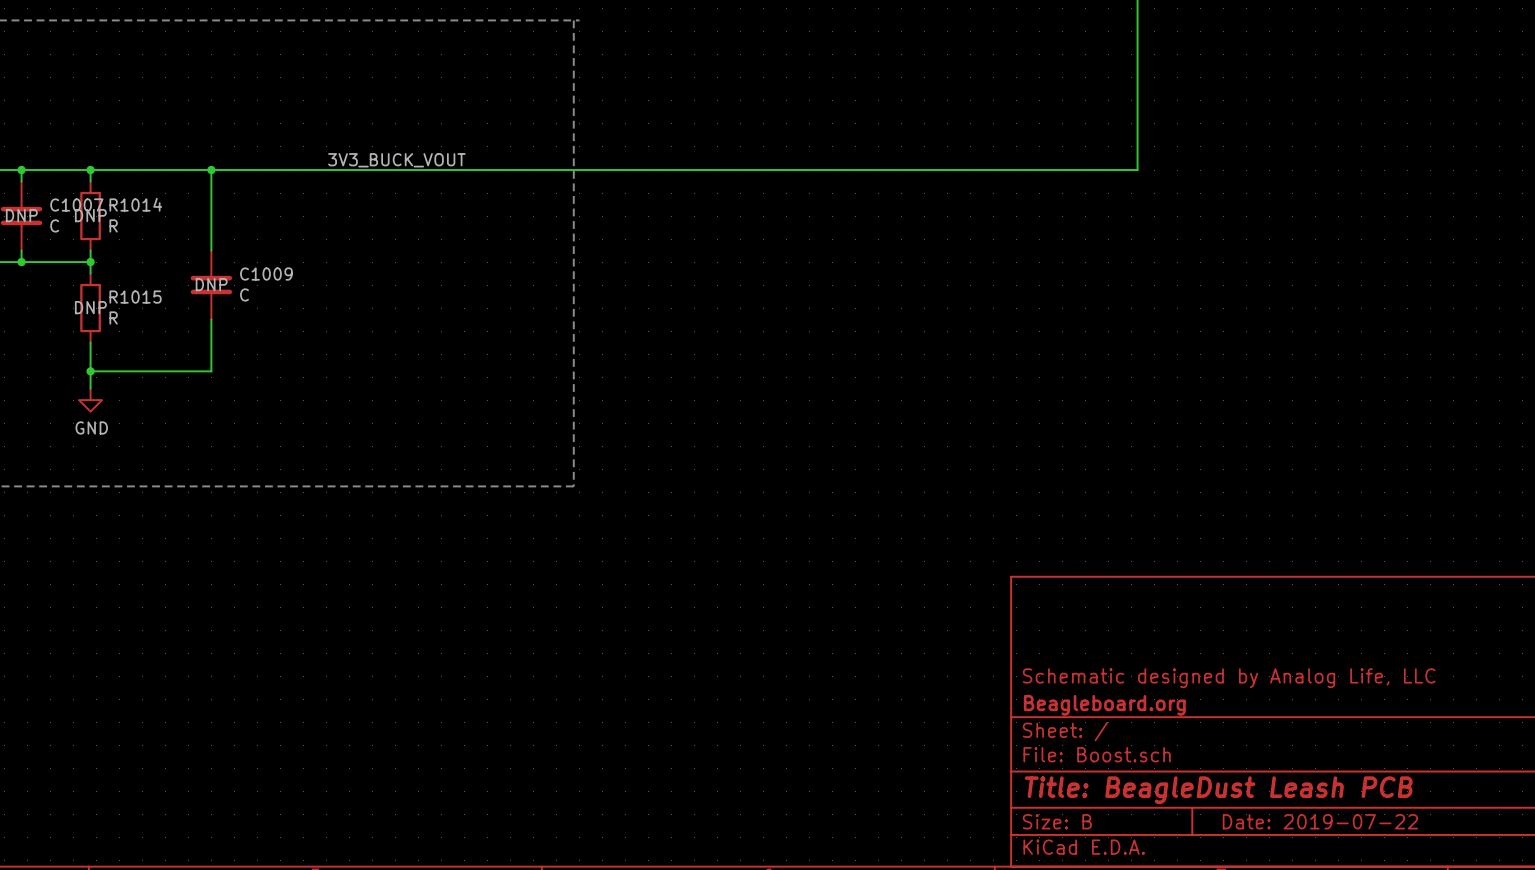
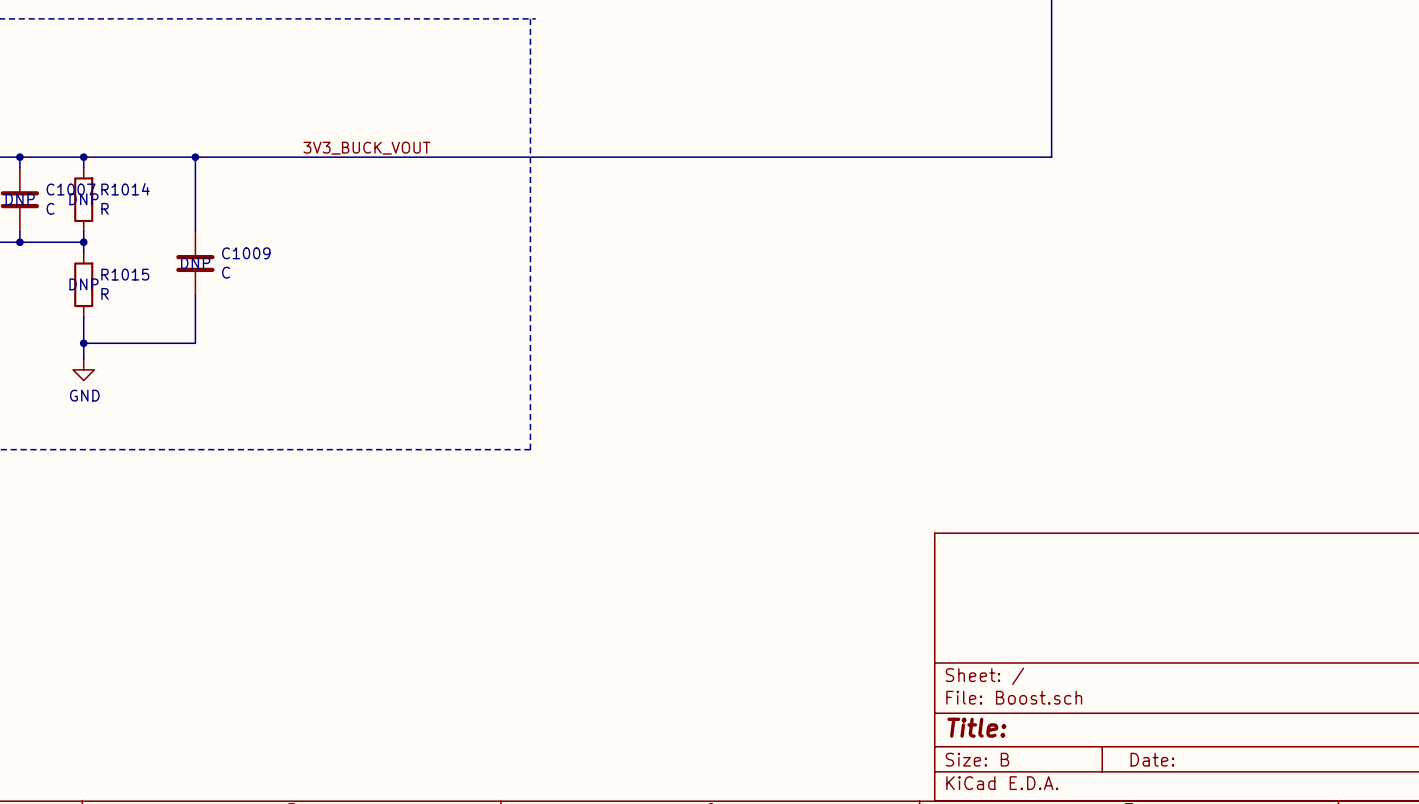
title block: Schematic designed by Analog Life, LLC (1229, 678) -> none
title block: Beagleboard.org (1104, 705) -> none
title block: Title: BeagleDust Leash PCB (1218, 790) -> Title: (976, 727)
title block: Date: 2019-07-22 (1320, 821) -> Date: (1152, 759)

